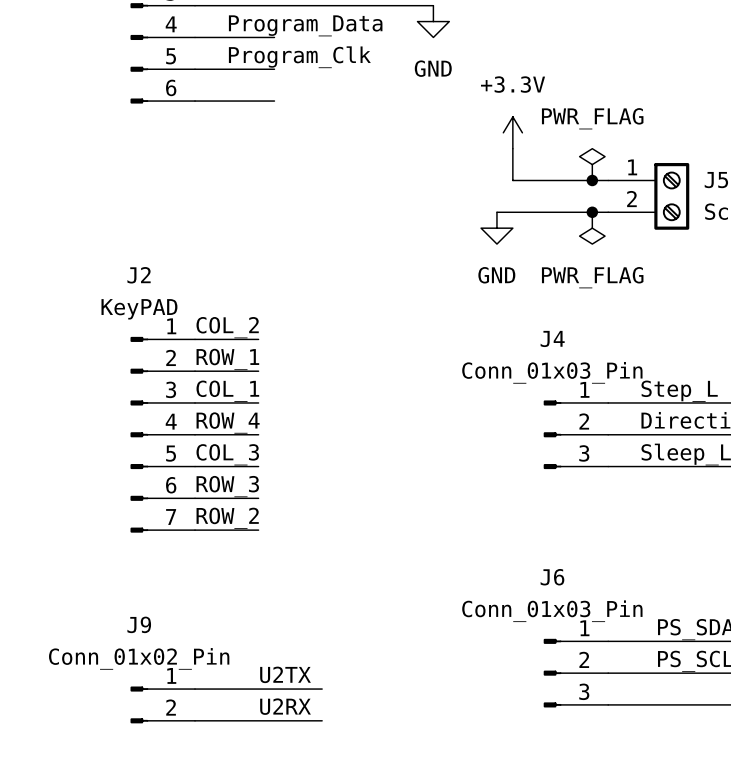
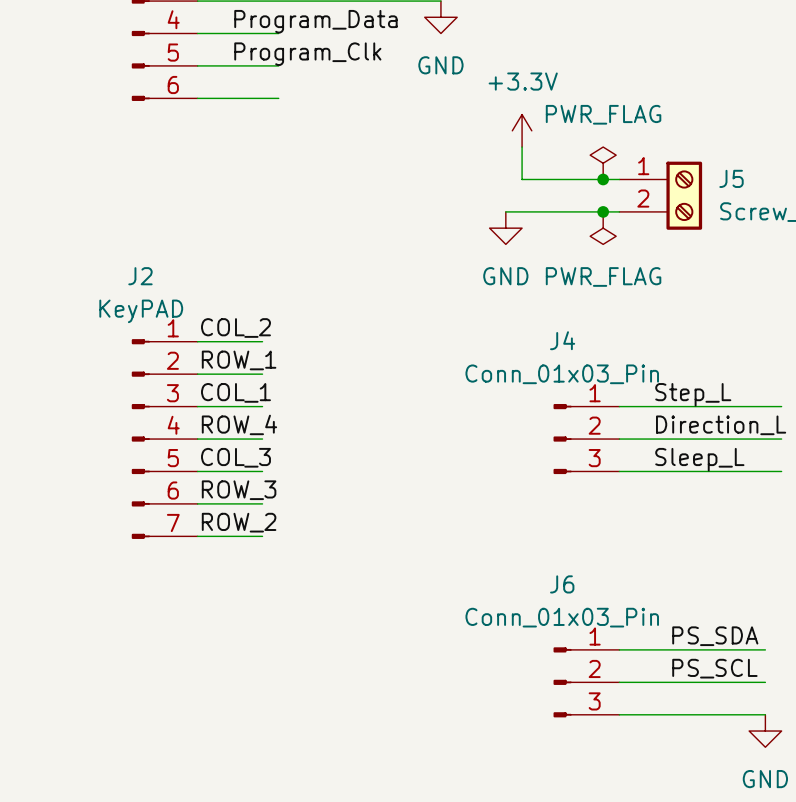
label: U2TX (285, 674) -> none
wire: (195, 689) (322, 689) -> none
J9: Conn_01x02_Pin (162, 704) -> none
label: U2RX (285, 706) -> none
wire: (195, 720) (322, 720) -> none

